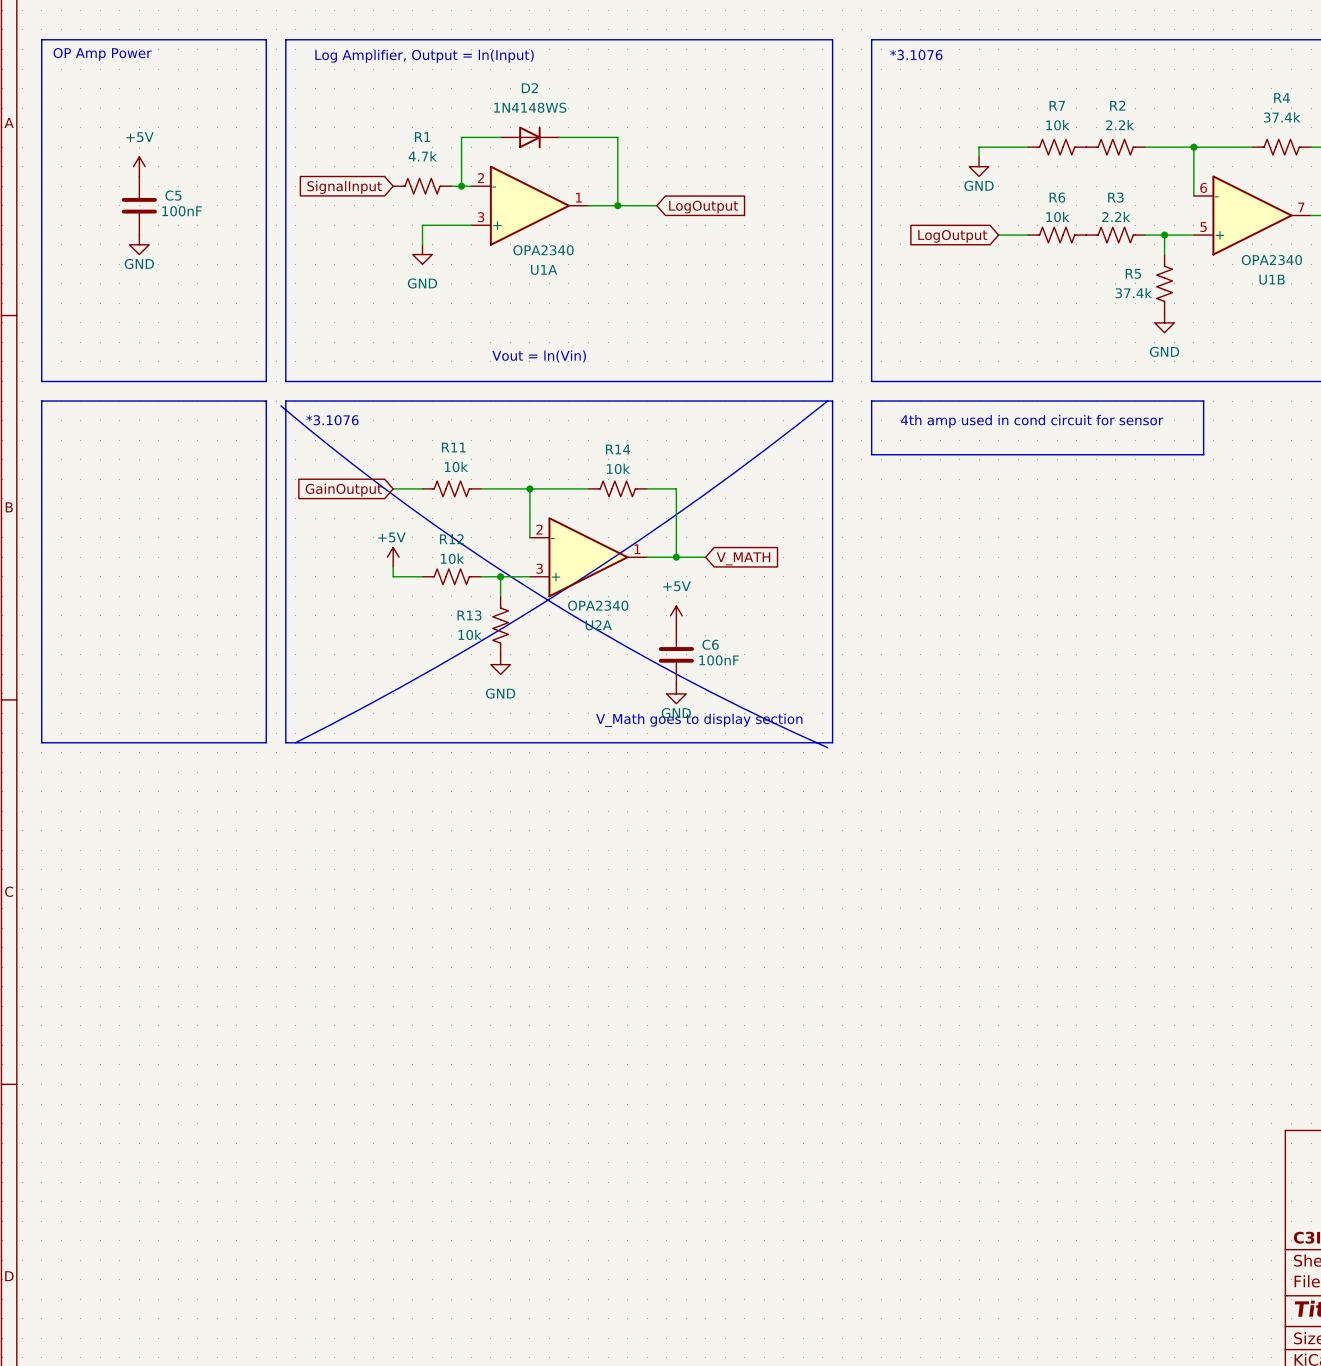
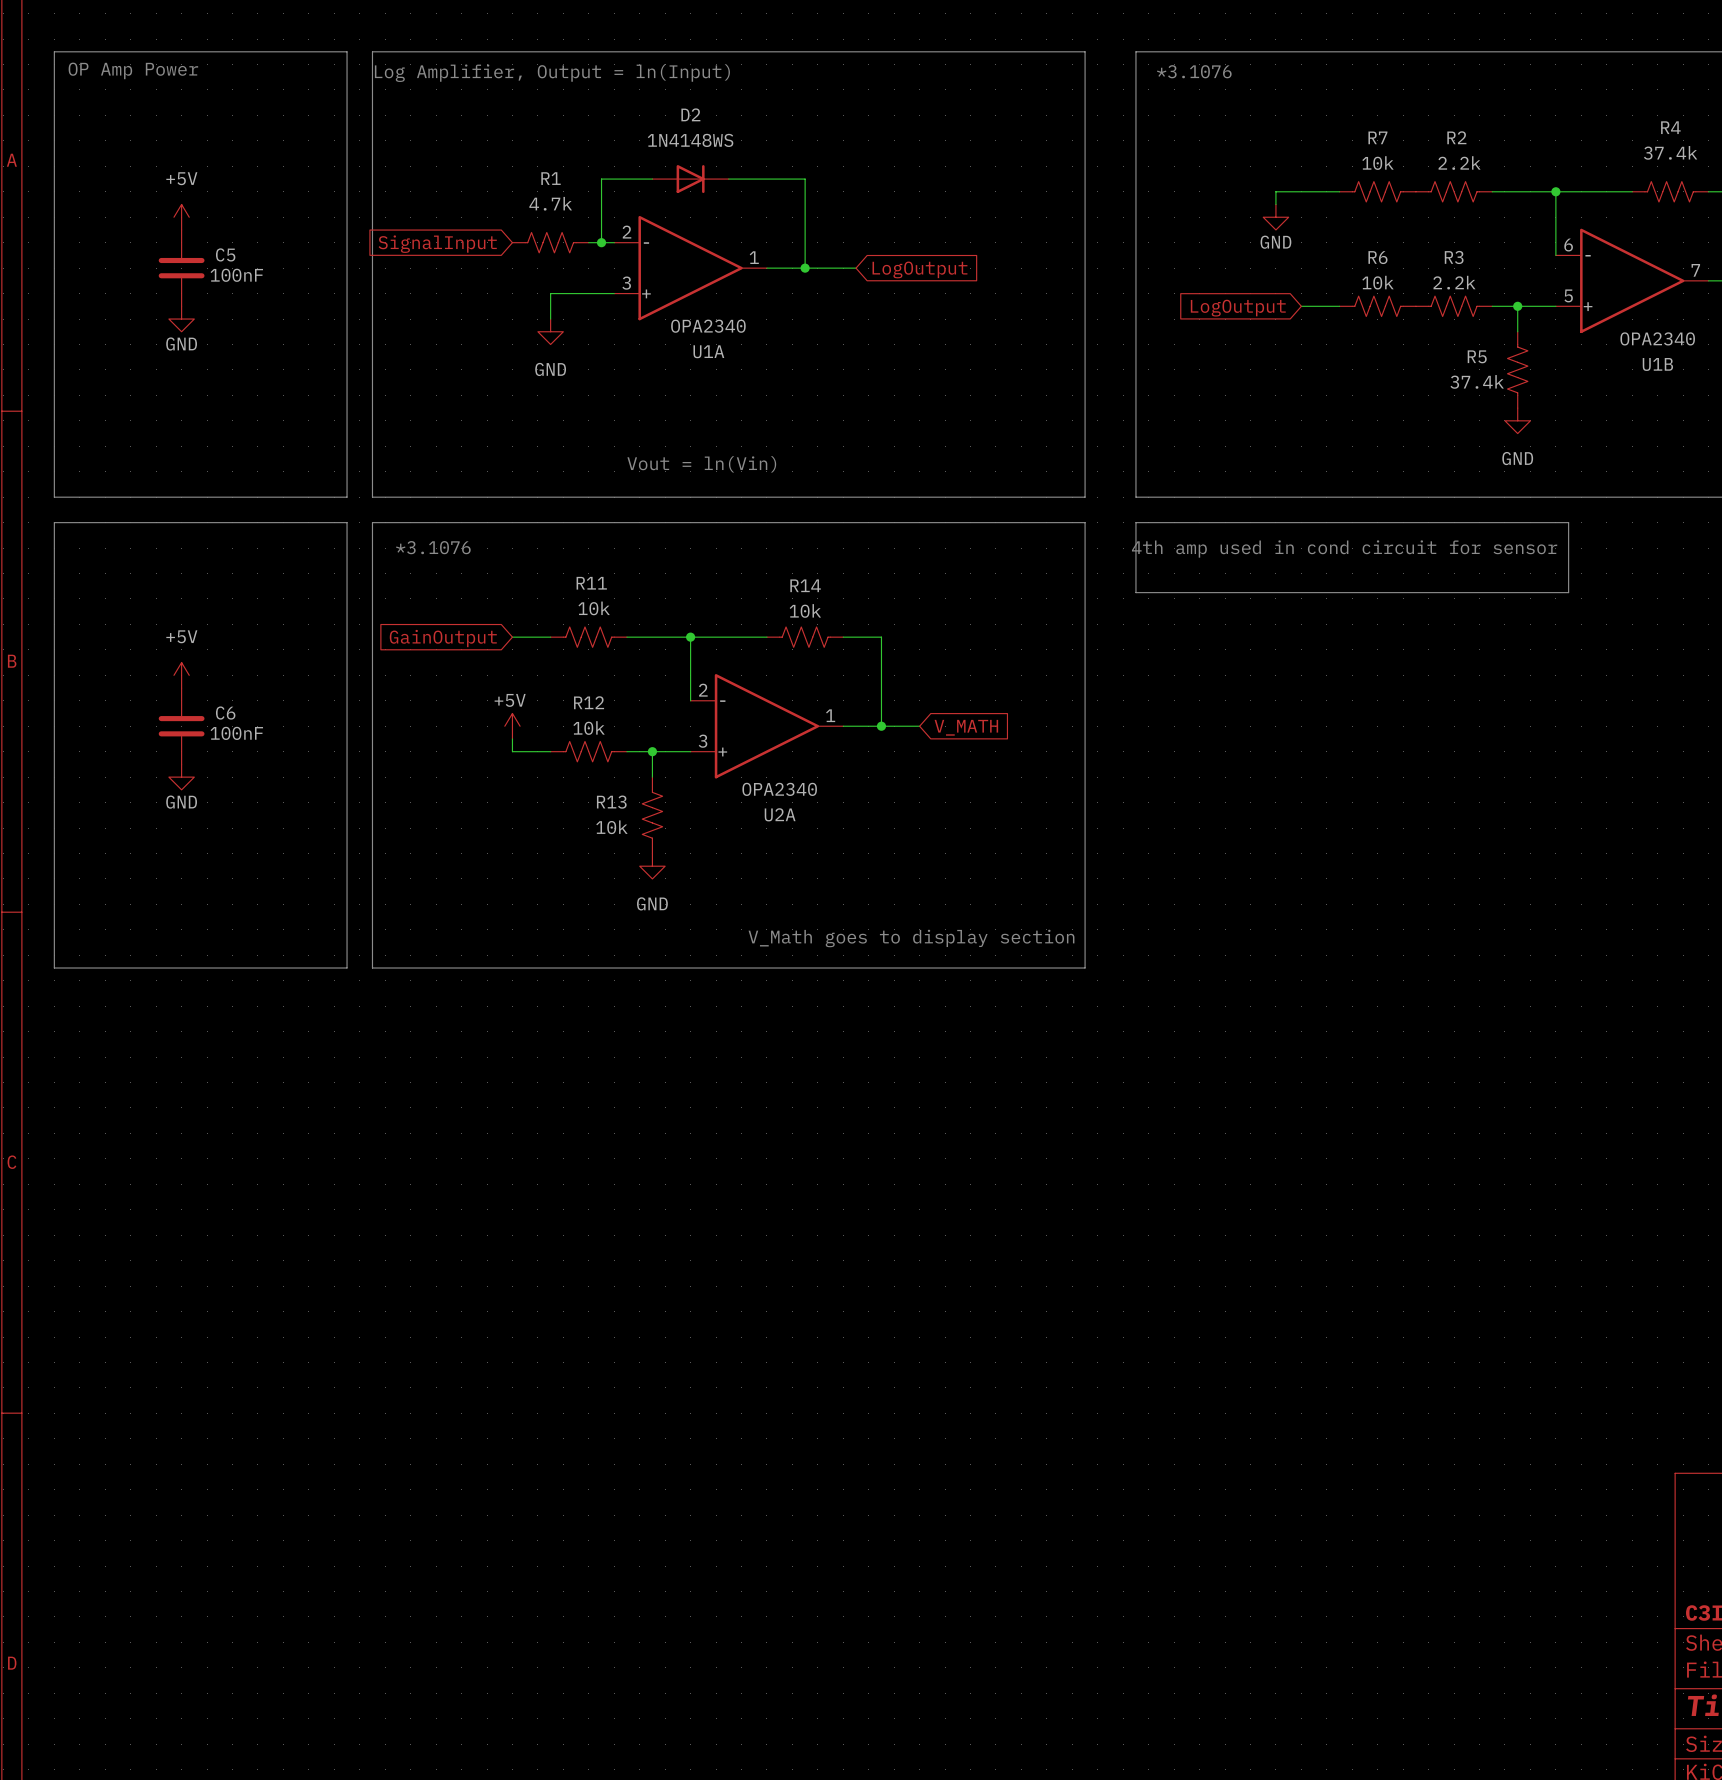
line: (827, 401) (701, 496) (570, 585) (435, 667) (295, 742) -> none
line: (280, 405) (408, 505) (542, 596) (682, 677) (827, 747) -> none
power symbol: none -> +5V (181, 675)
power symbol: none -> GND (181, 777)
power symbol: +5V (676, 615) -> none
C6 position: (676, 654) -> (181, 726)
power symbol: GND (676, 693) -> none

